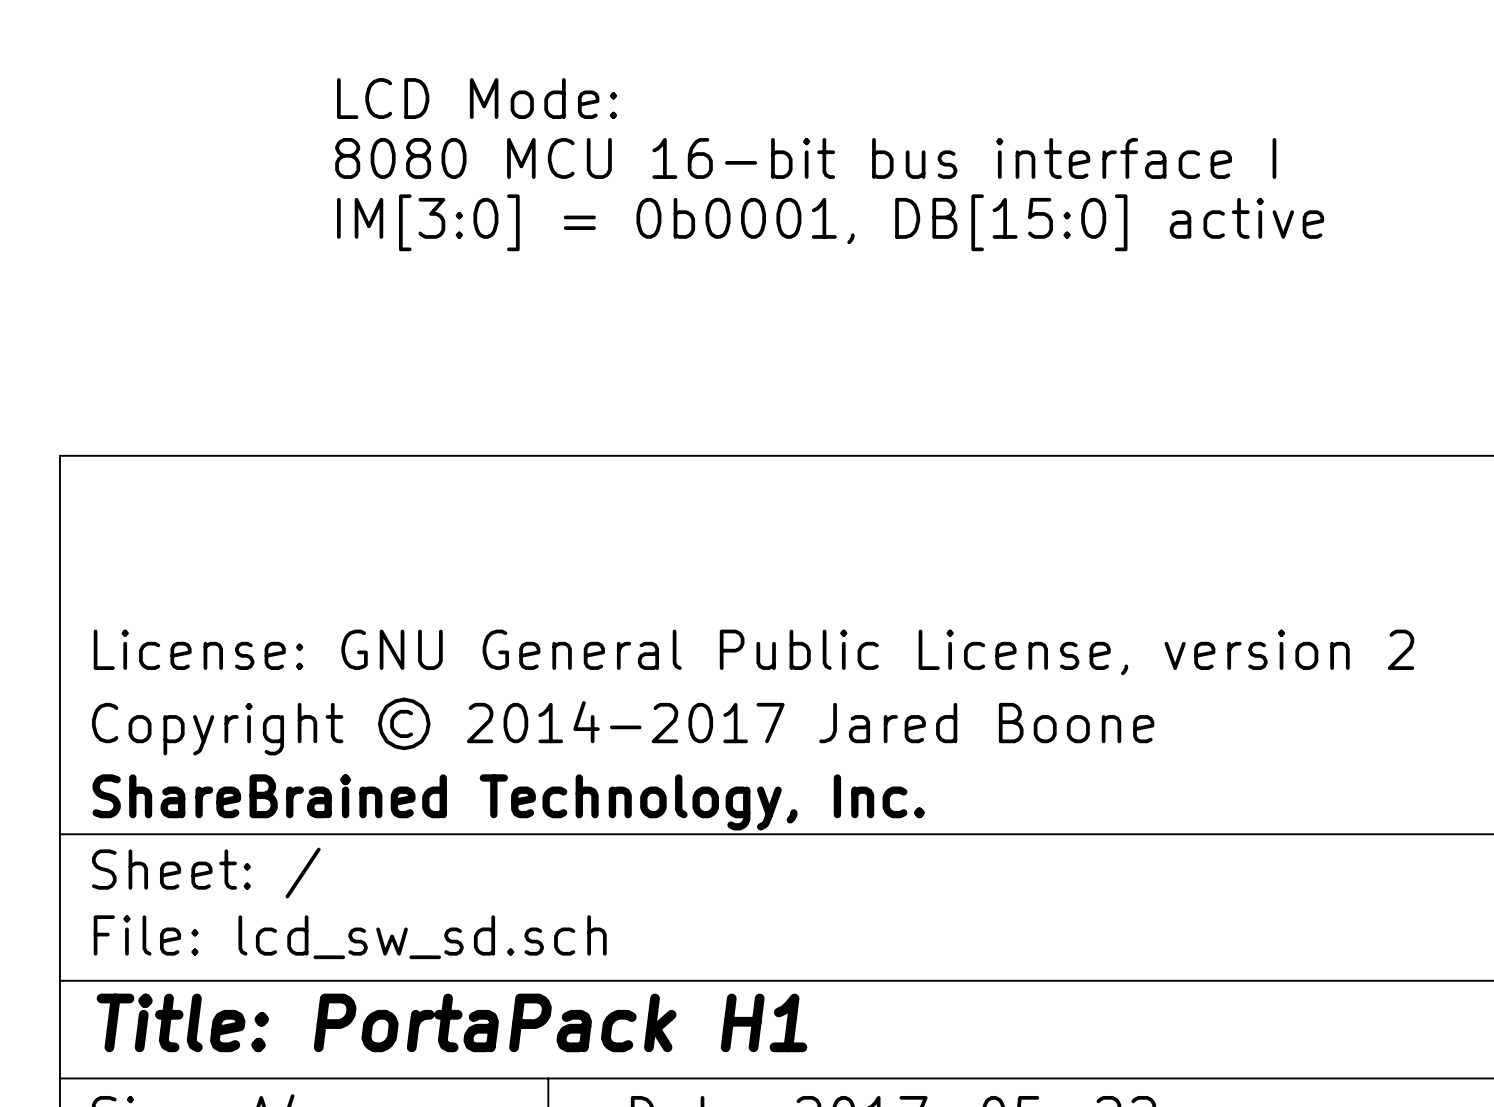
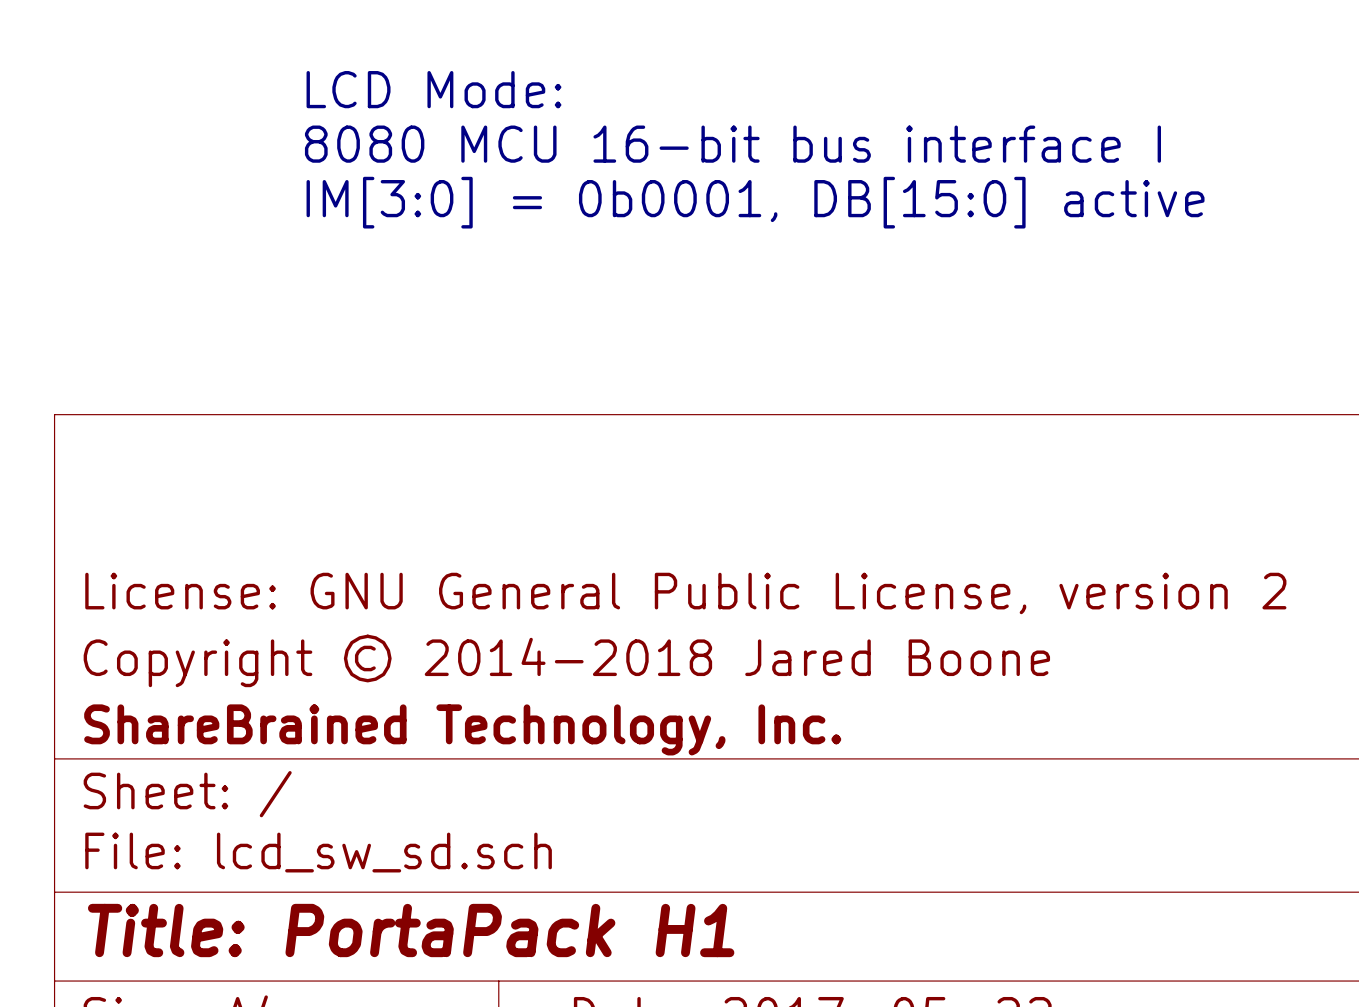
title block: Copyright © 2014-2017 Jared Boone (623, 726) -> Copyright © 2014-2018 Jared Boone (566, 660)

